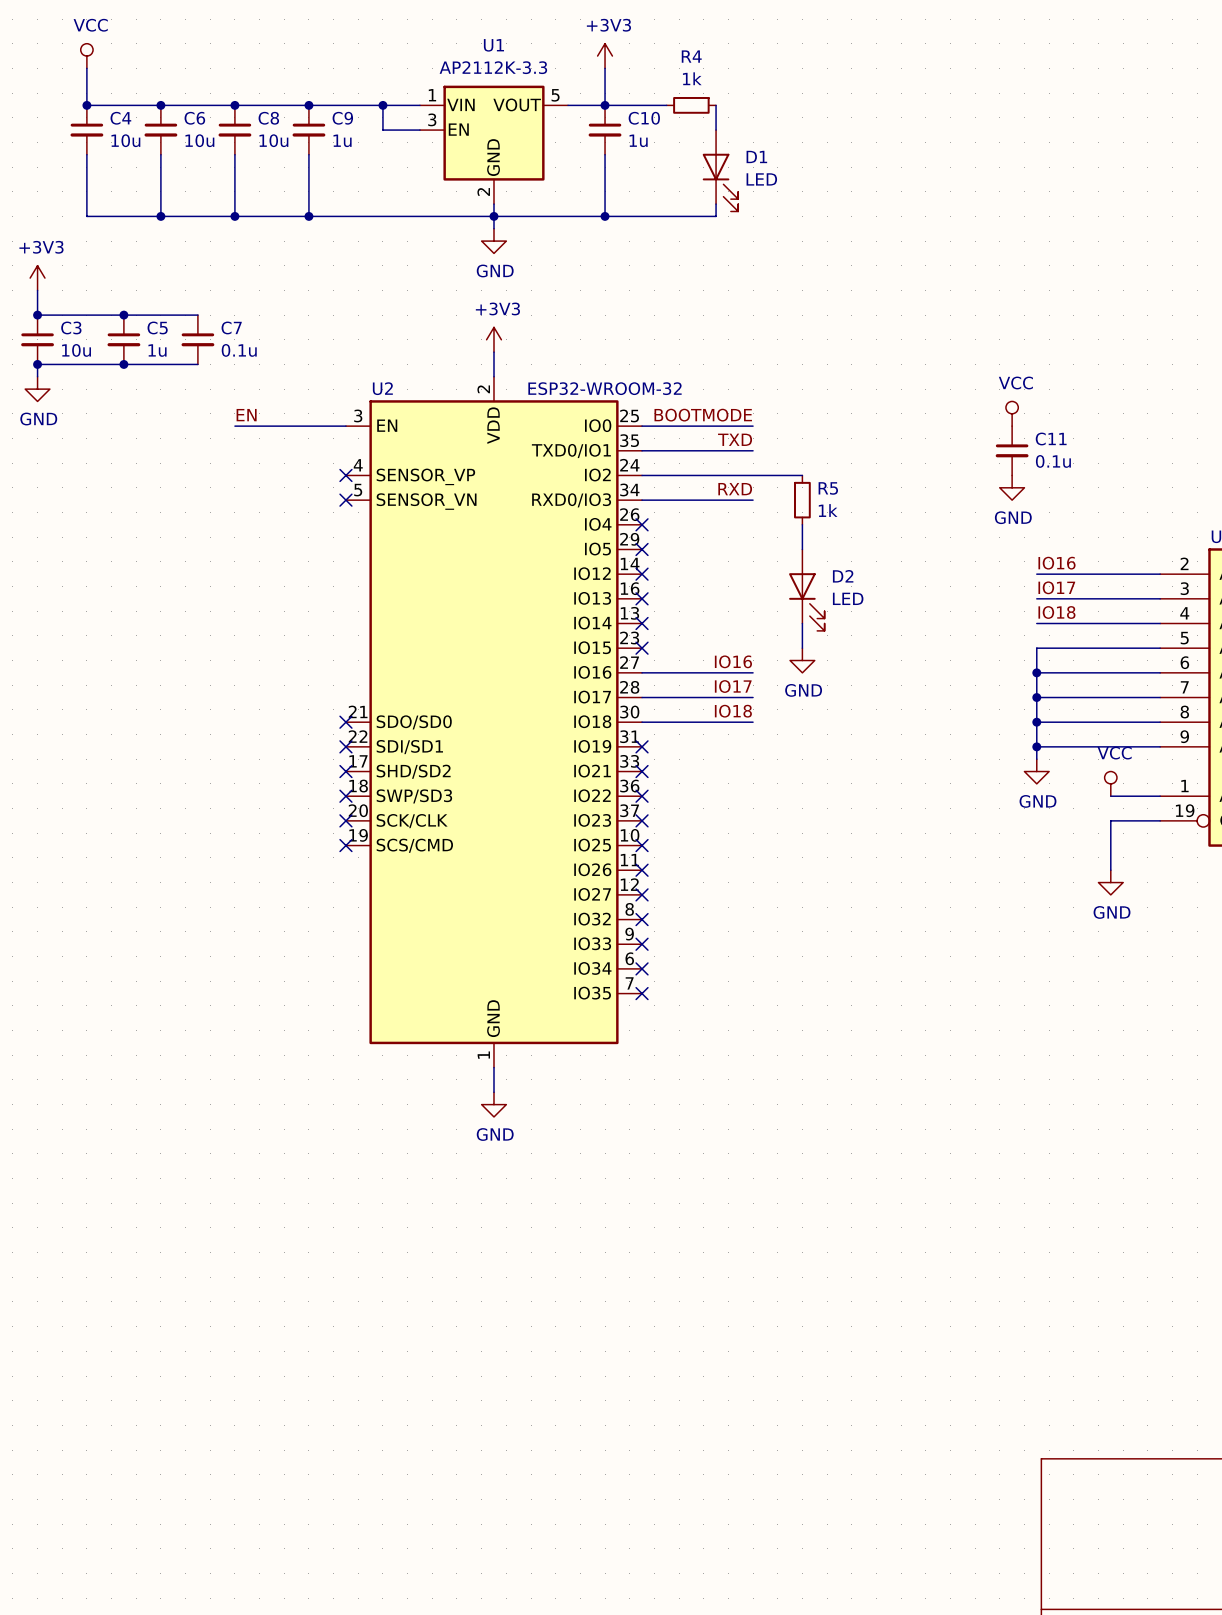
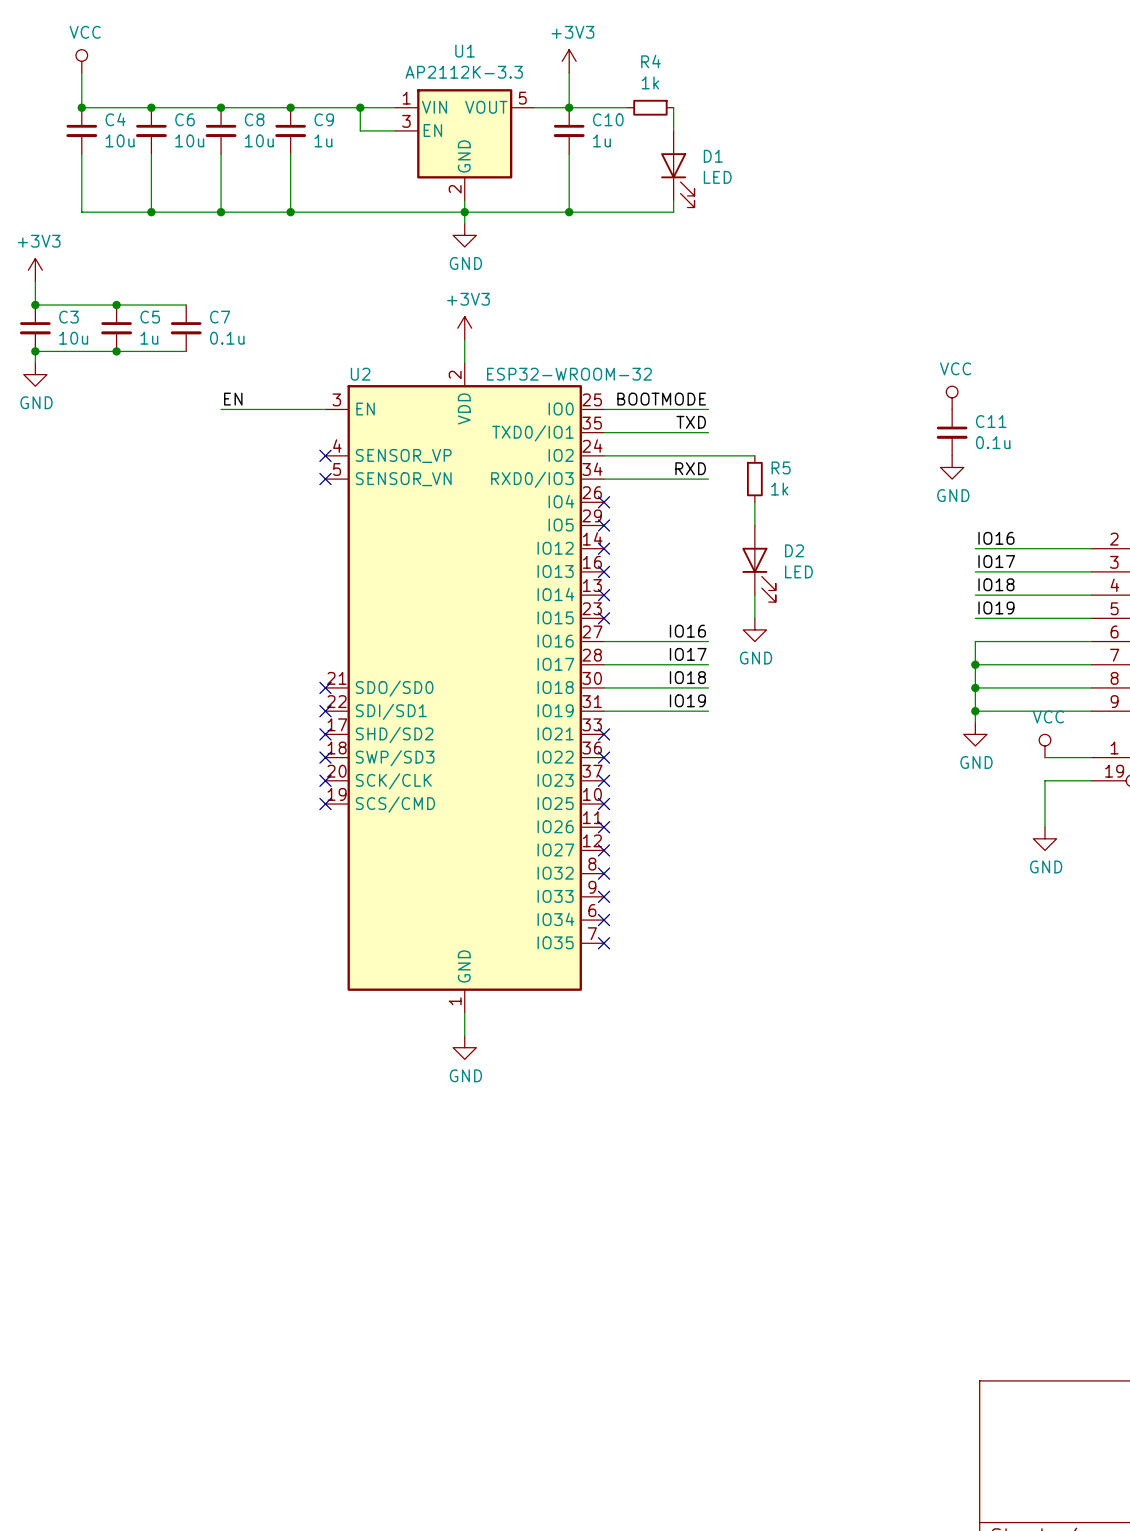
label: none -> IO19 (996, 607)
wire: (1036, 648) (1036, 672) -> none
junction: (1036, 672) -> none
label: none -> IO19 (687, 700)
wire: none -> (604, 711) (708, 711)
no-connect mark: (642, 746) -> none

